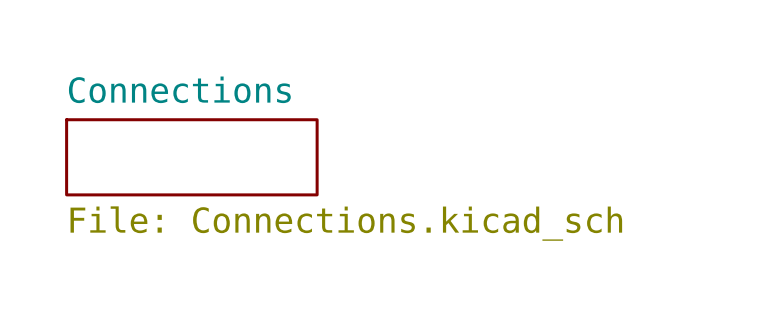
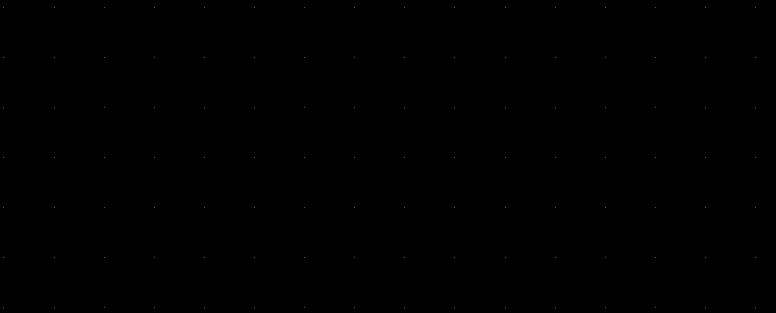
sheet Connections: File: Connections.kicad_sch (191, 157) -> none

